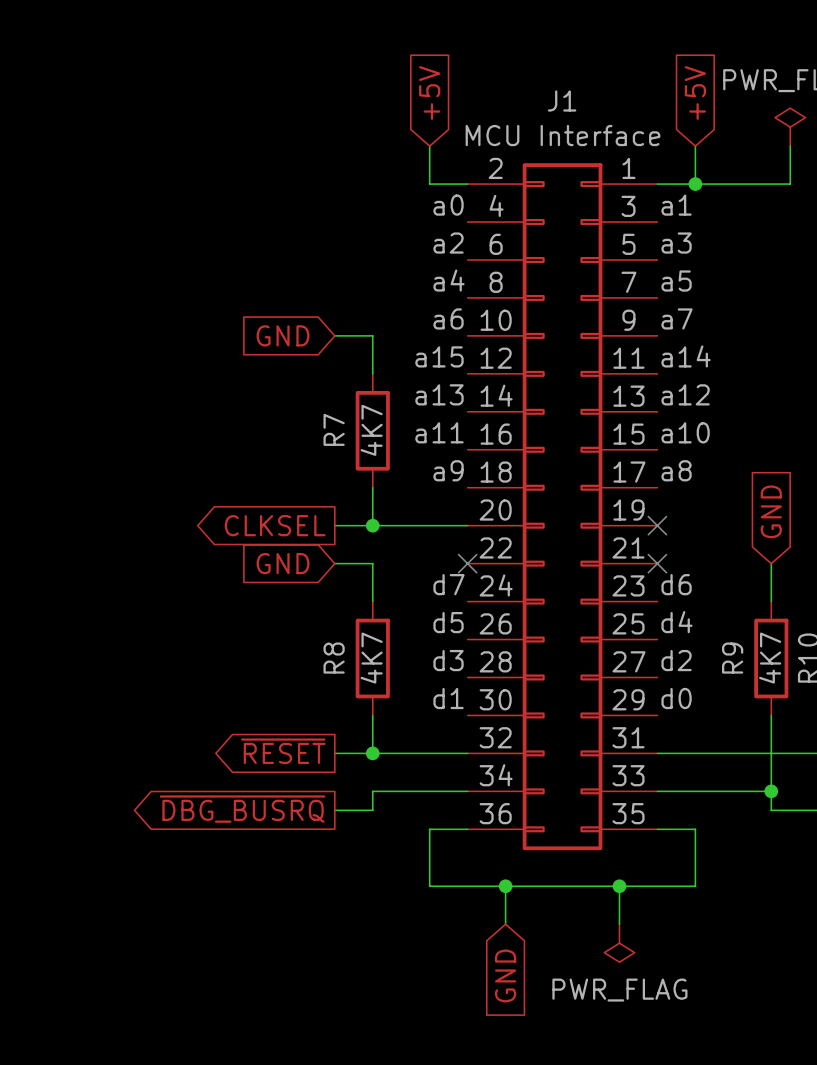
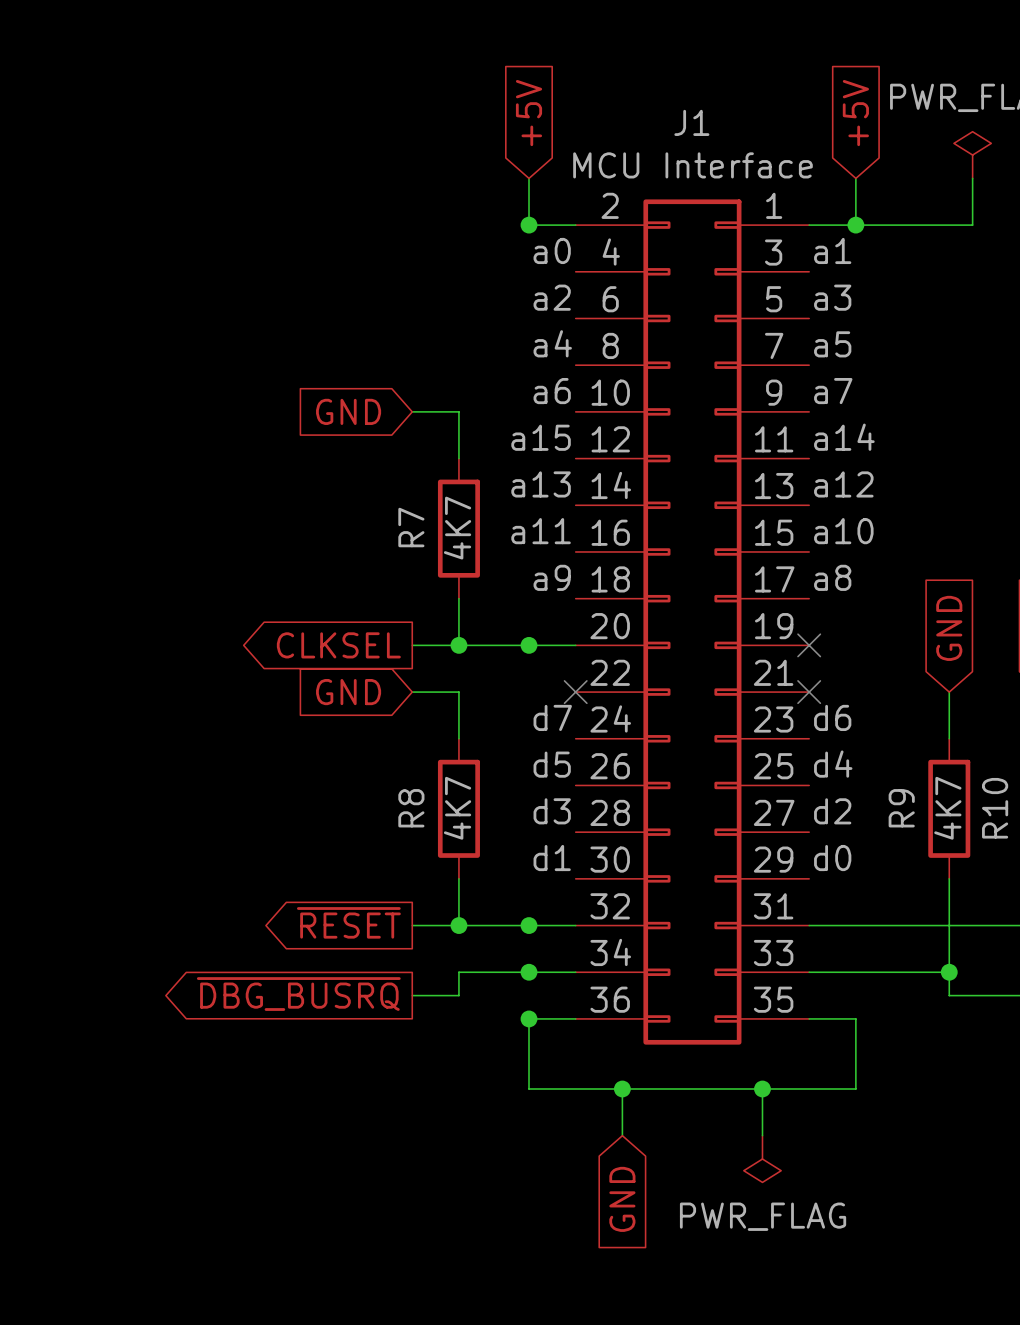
junction: none -> (529, 225)
junction: none -> (529, 645)
junction: none -> (529, 925)
junction: none -> (529, 972)
junction: none -> (529, 1018)

